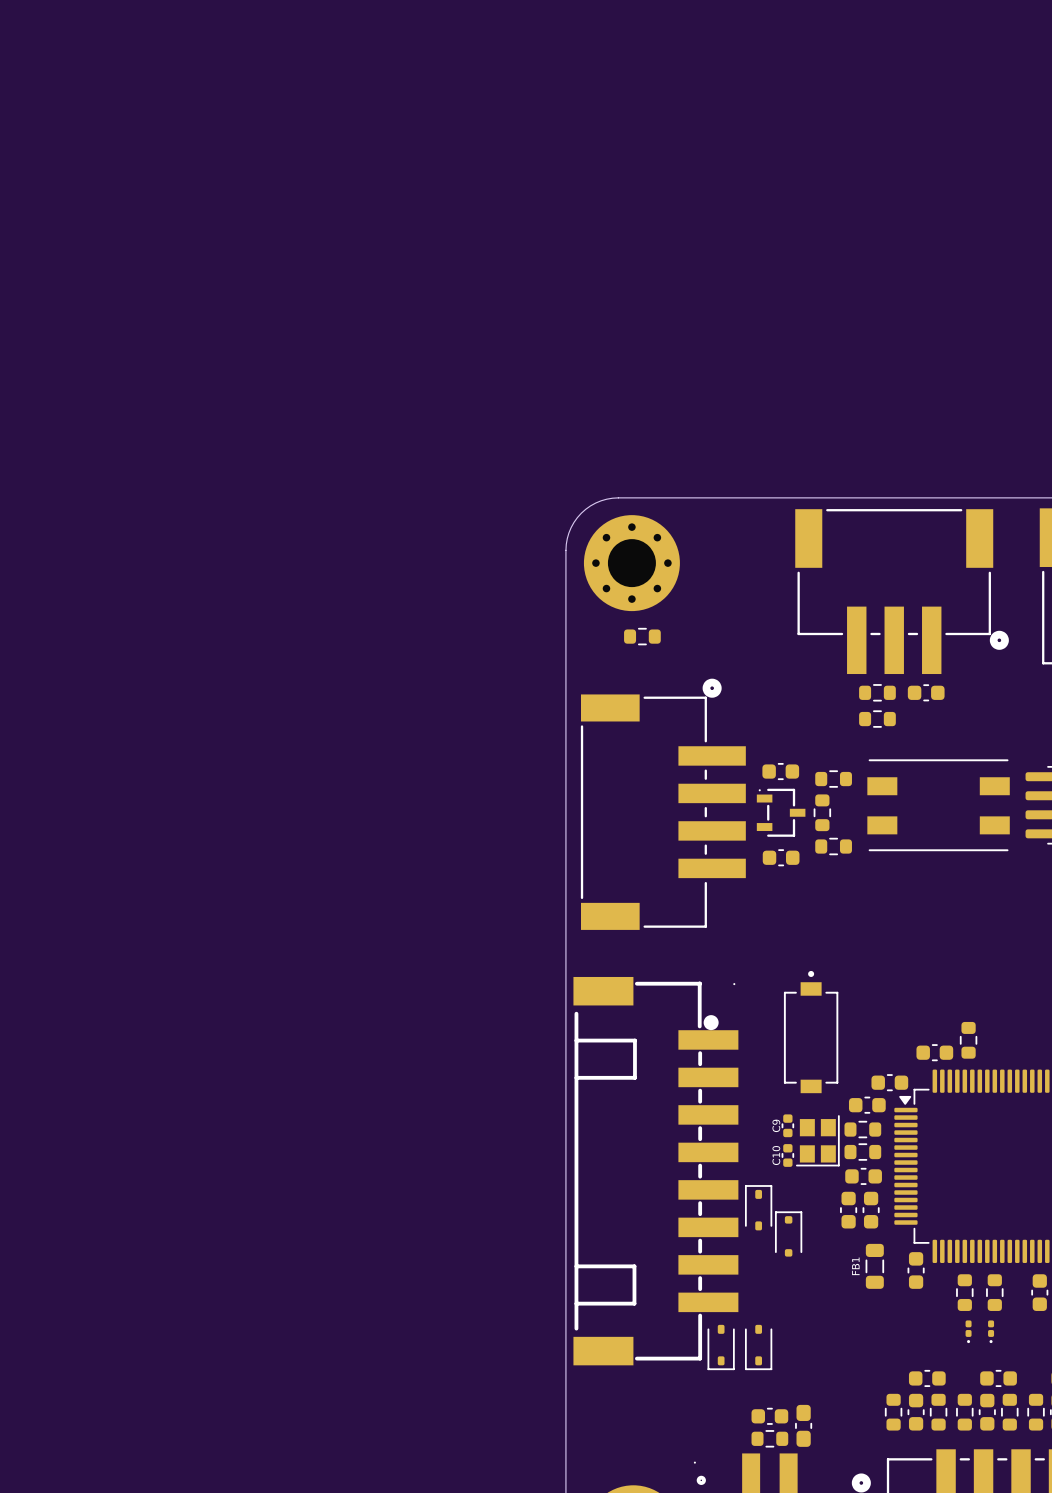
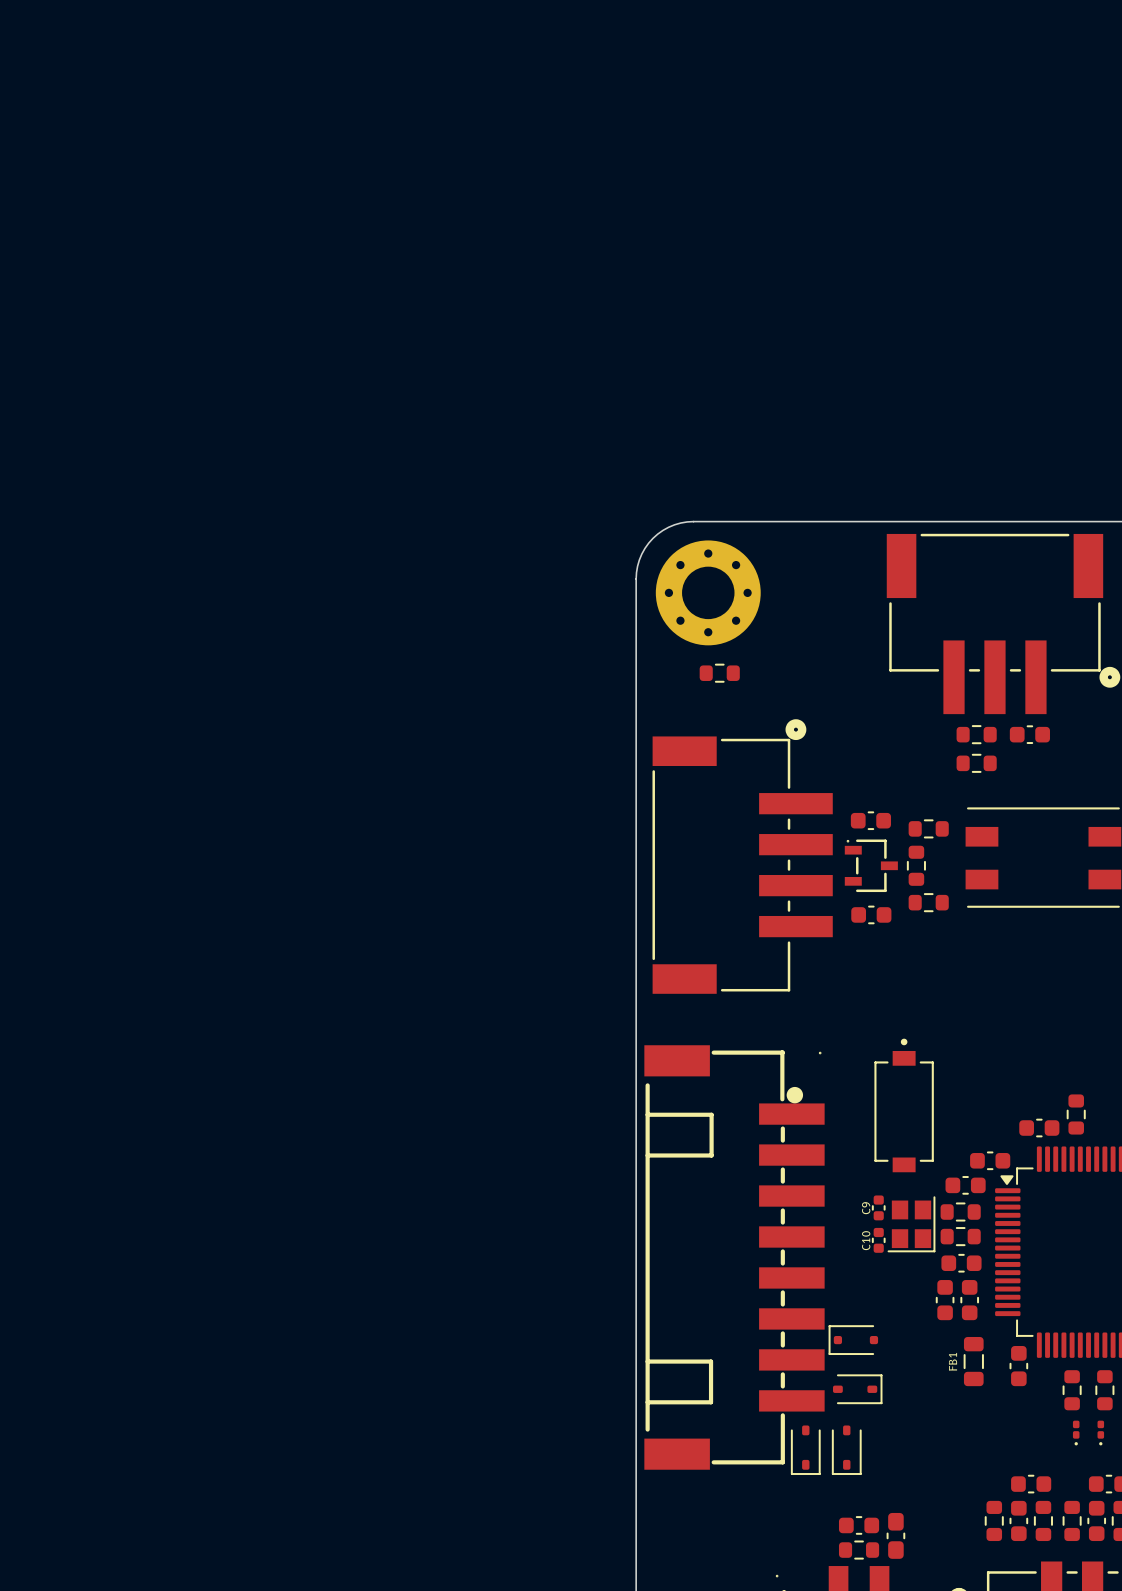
part rotation: 0° (758, 1207) -> 90° clockwise (857, 1389)
part position: (758, 1207) -> (857, 1389)
part rotation: 0° (788, 1233) -> 90° counterclockwise (853, 1340)

